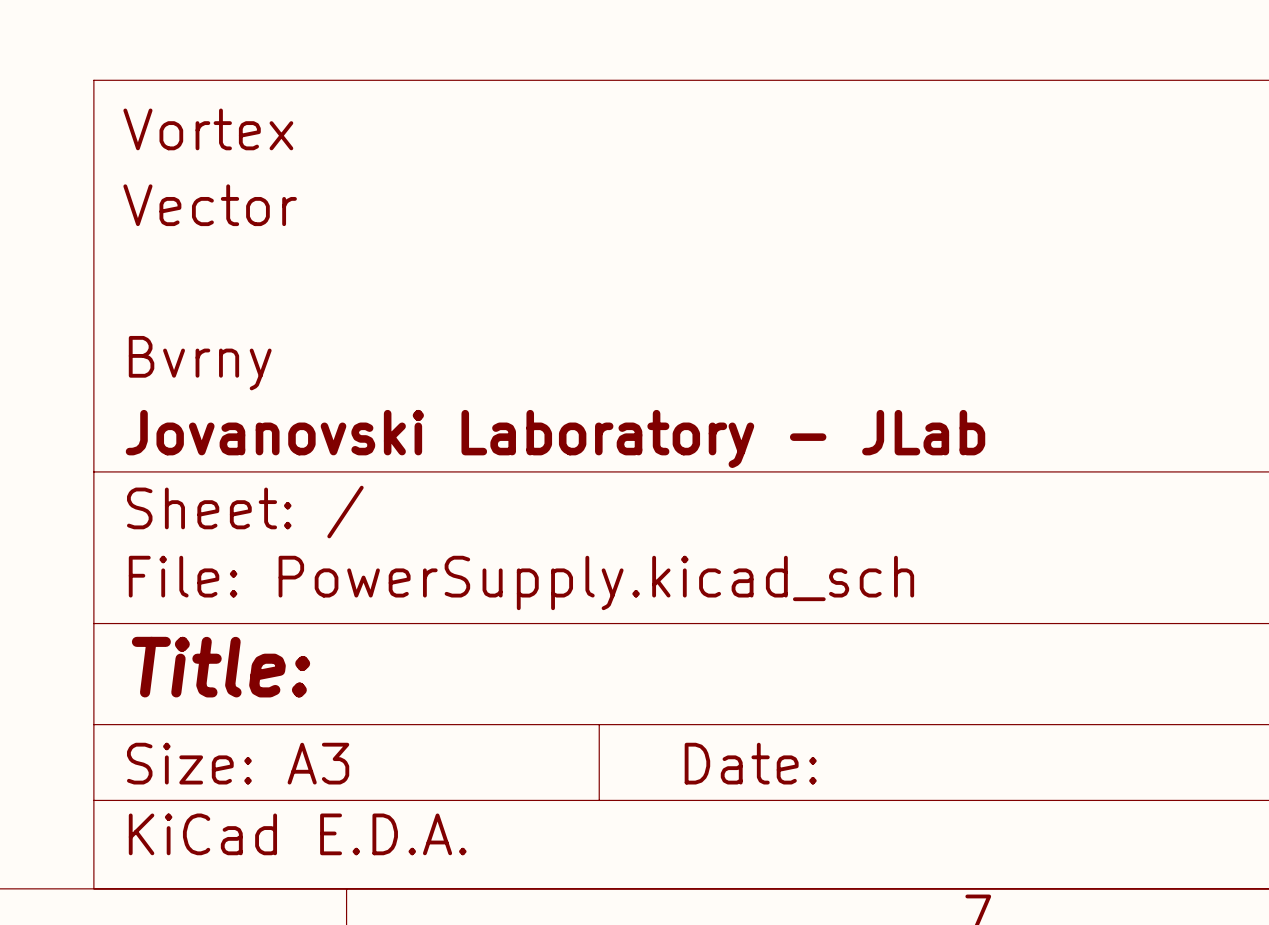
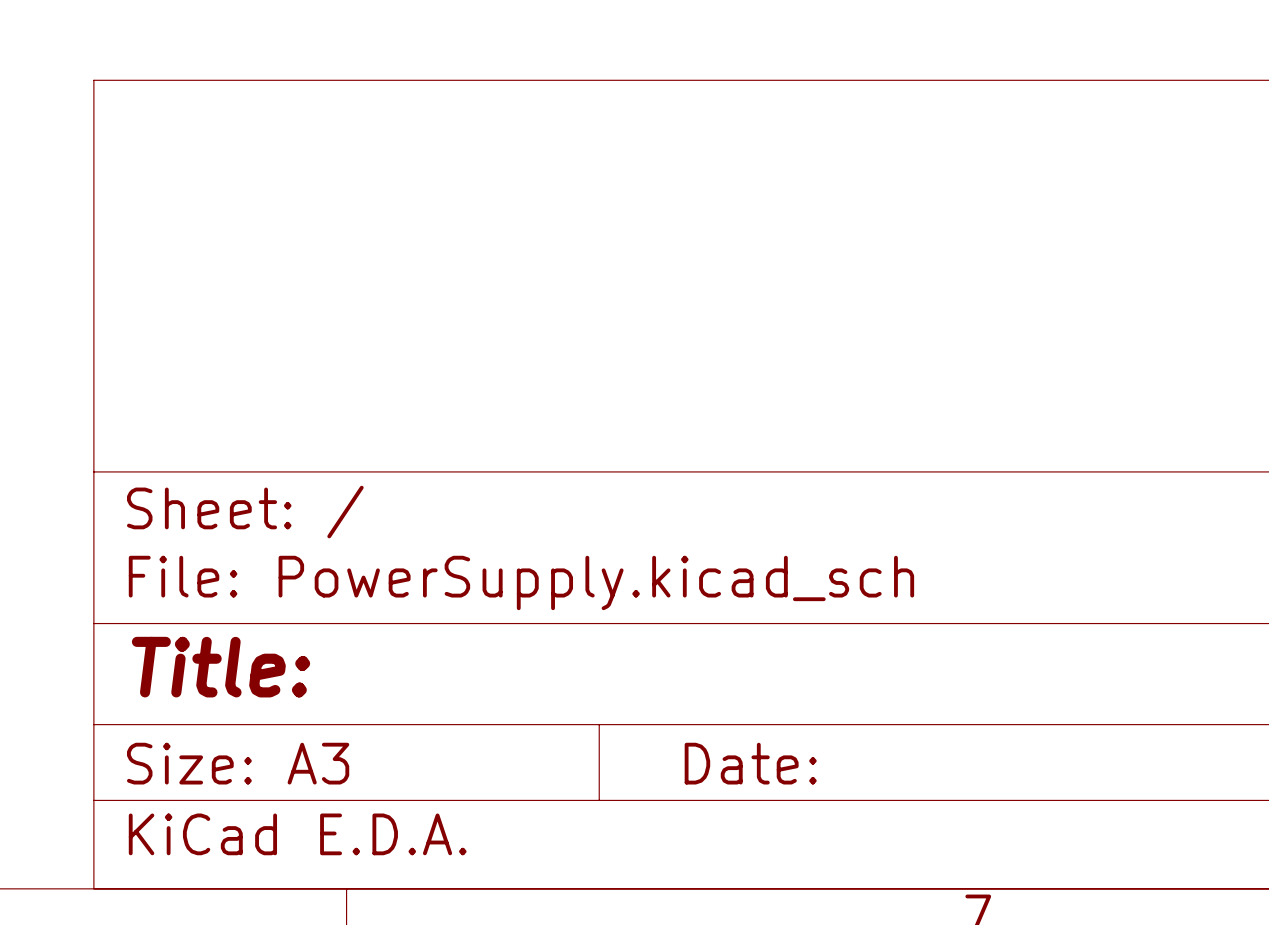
title block: Vortex (208, 129) -> none
title block: Vector (210, 205) -> none
title block: Bvrny (200, 363) -> none
title block: Jovanovski Laboratory - JLab (555, 438) -> none

